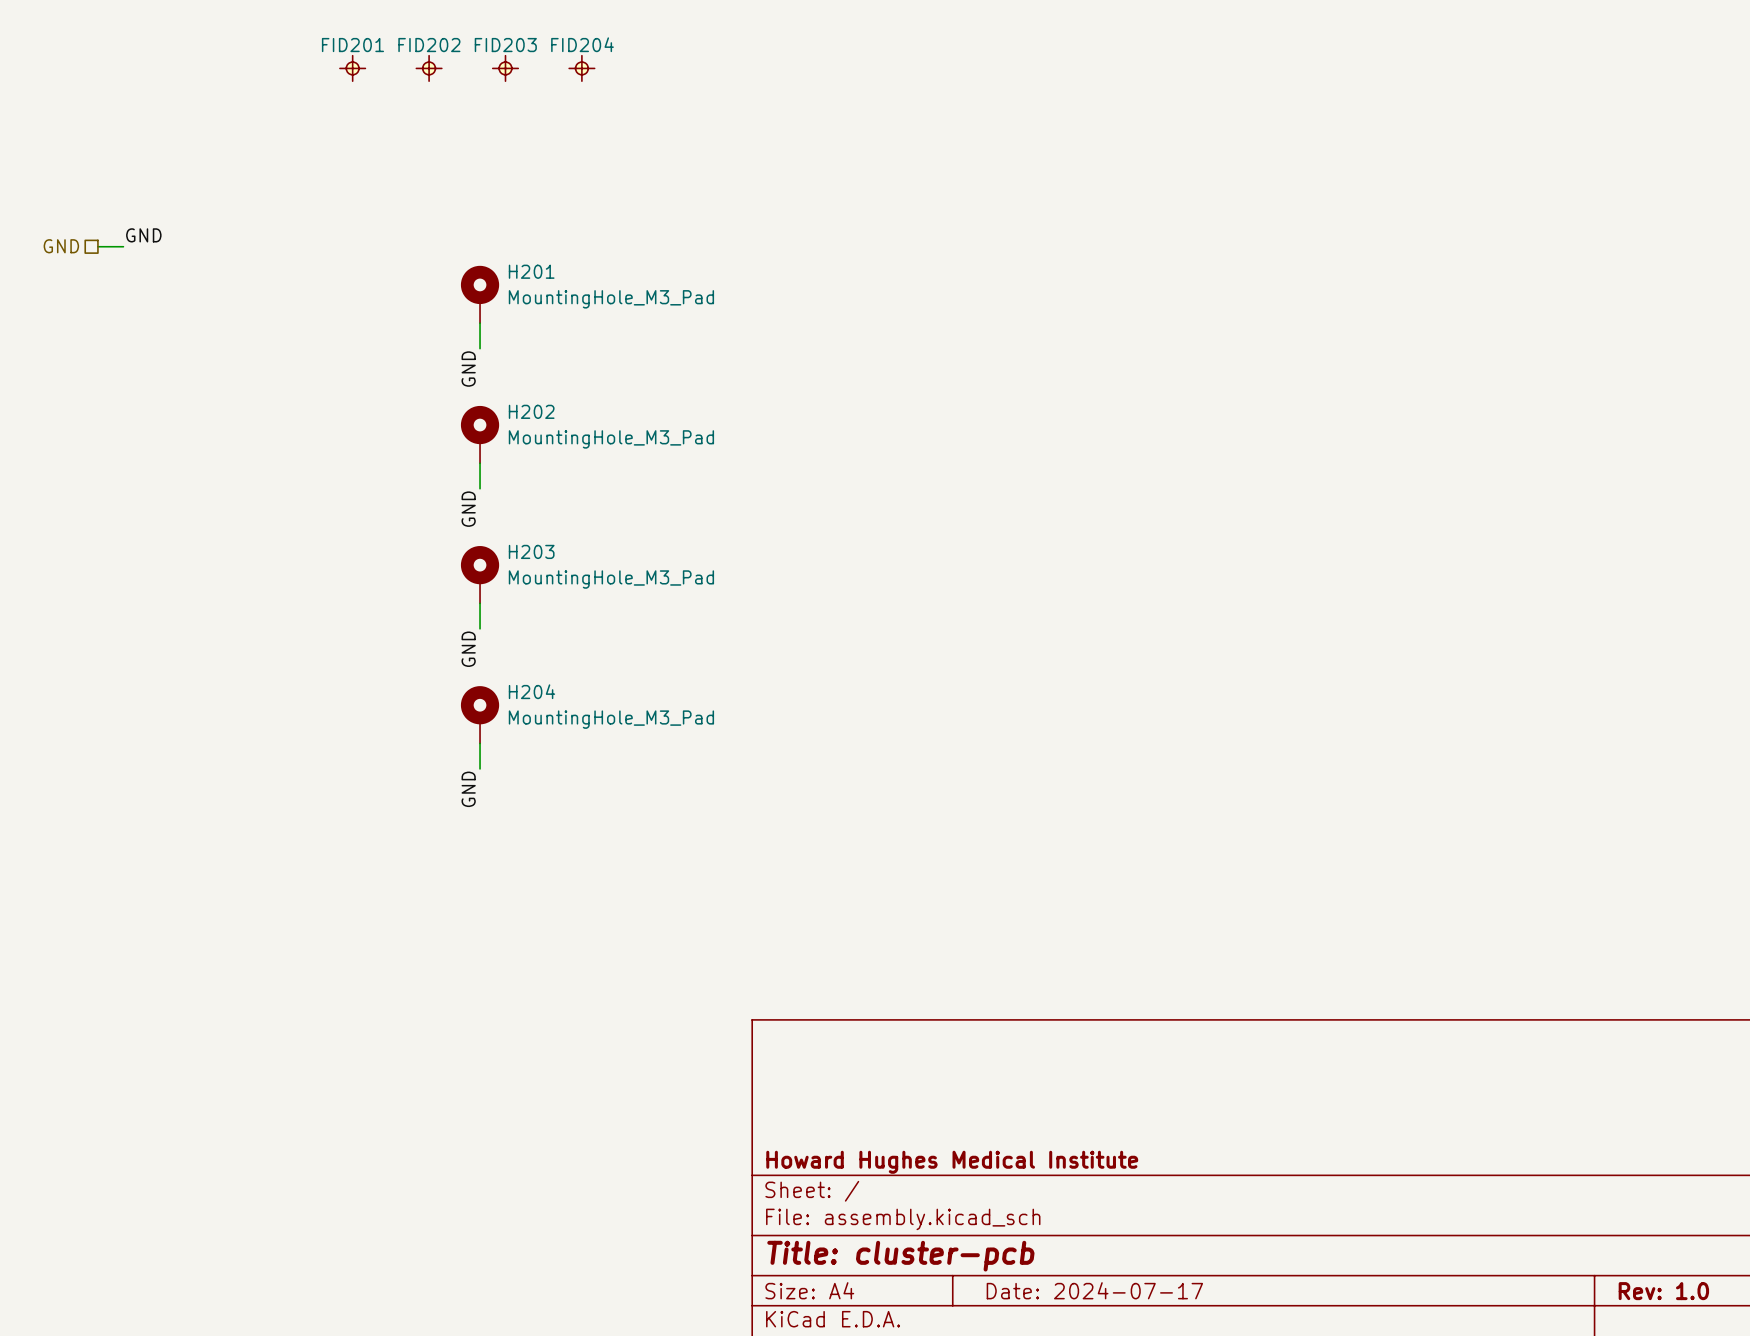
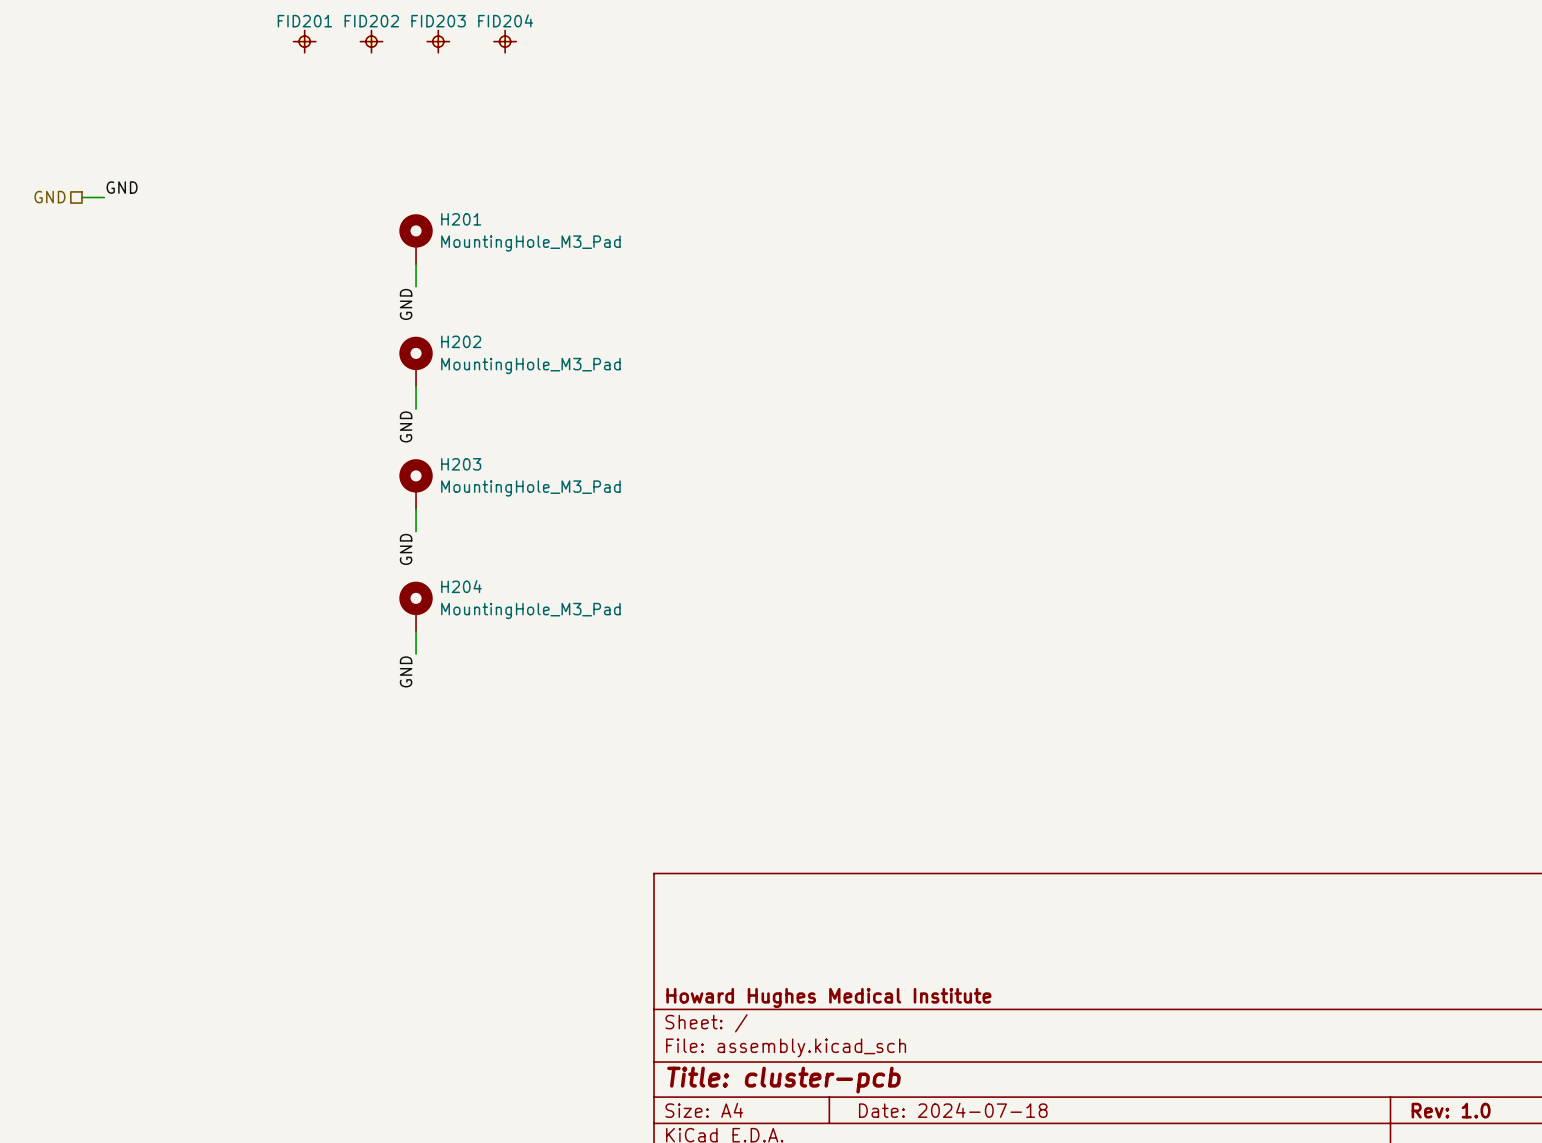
title block: Date: 2024-07-17 (1094, 1290) -> Date: 2024-07-18 (953, 1110)

